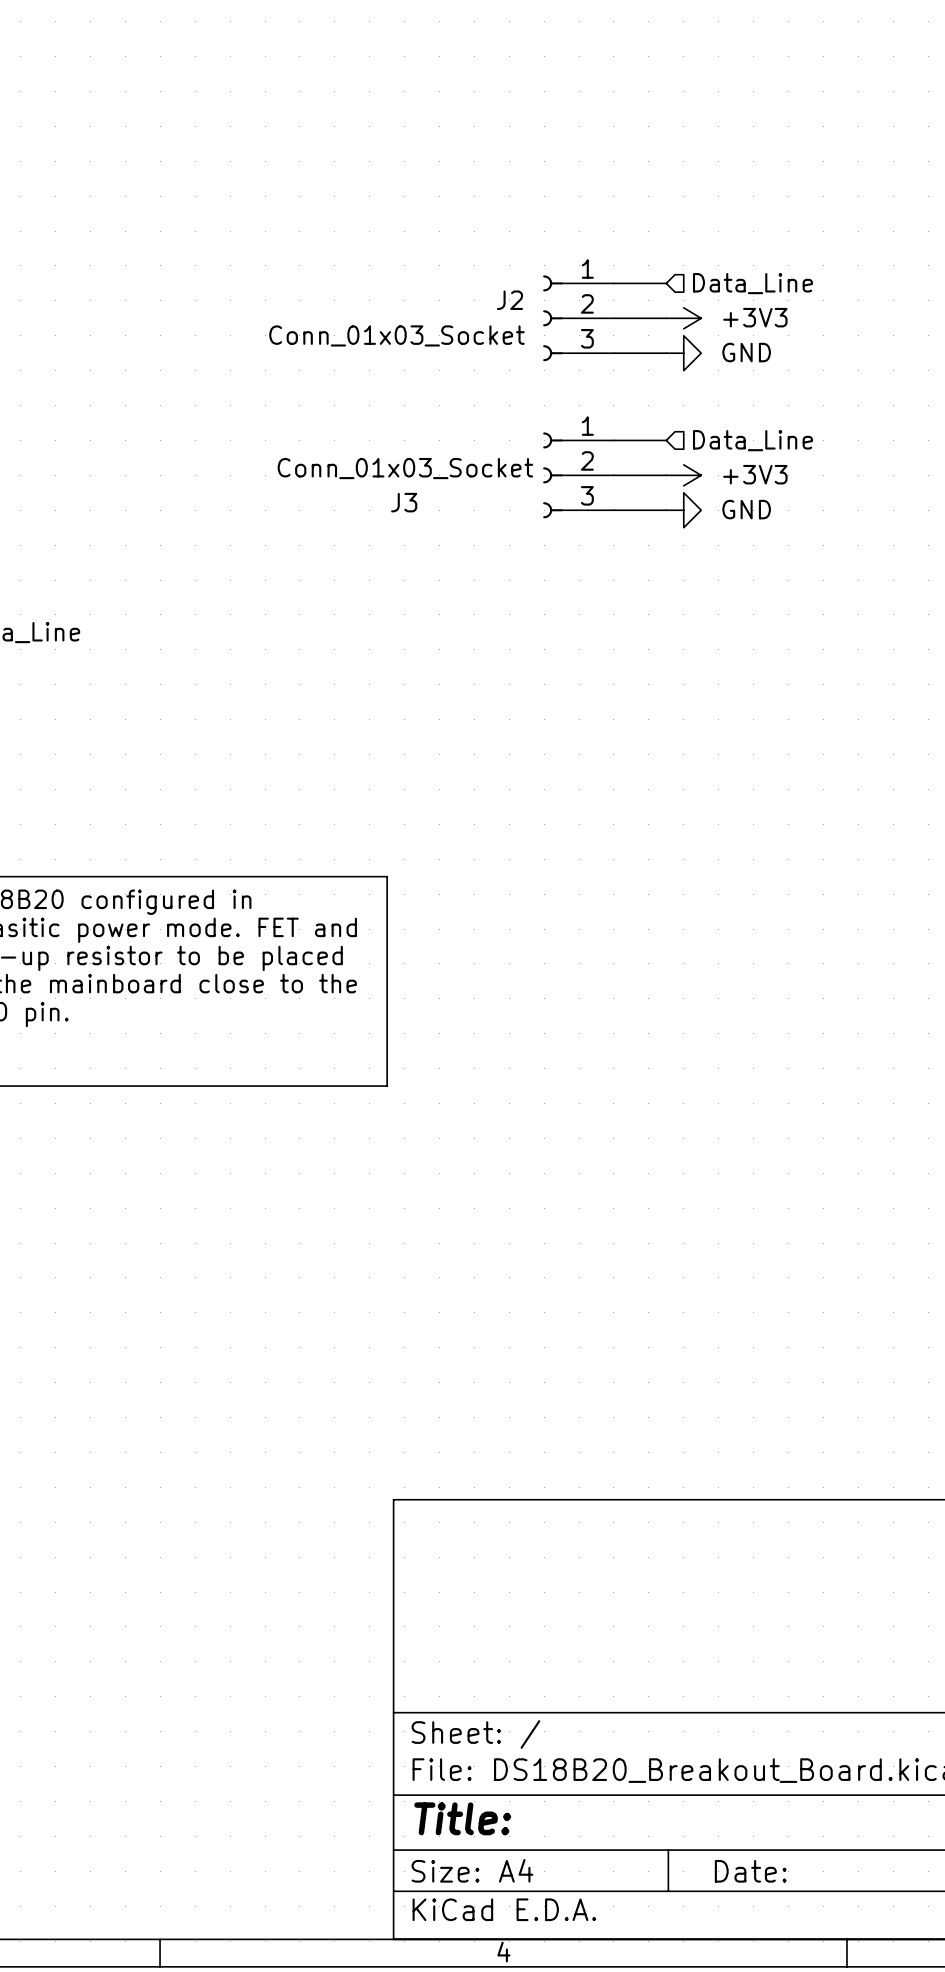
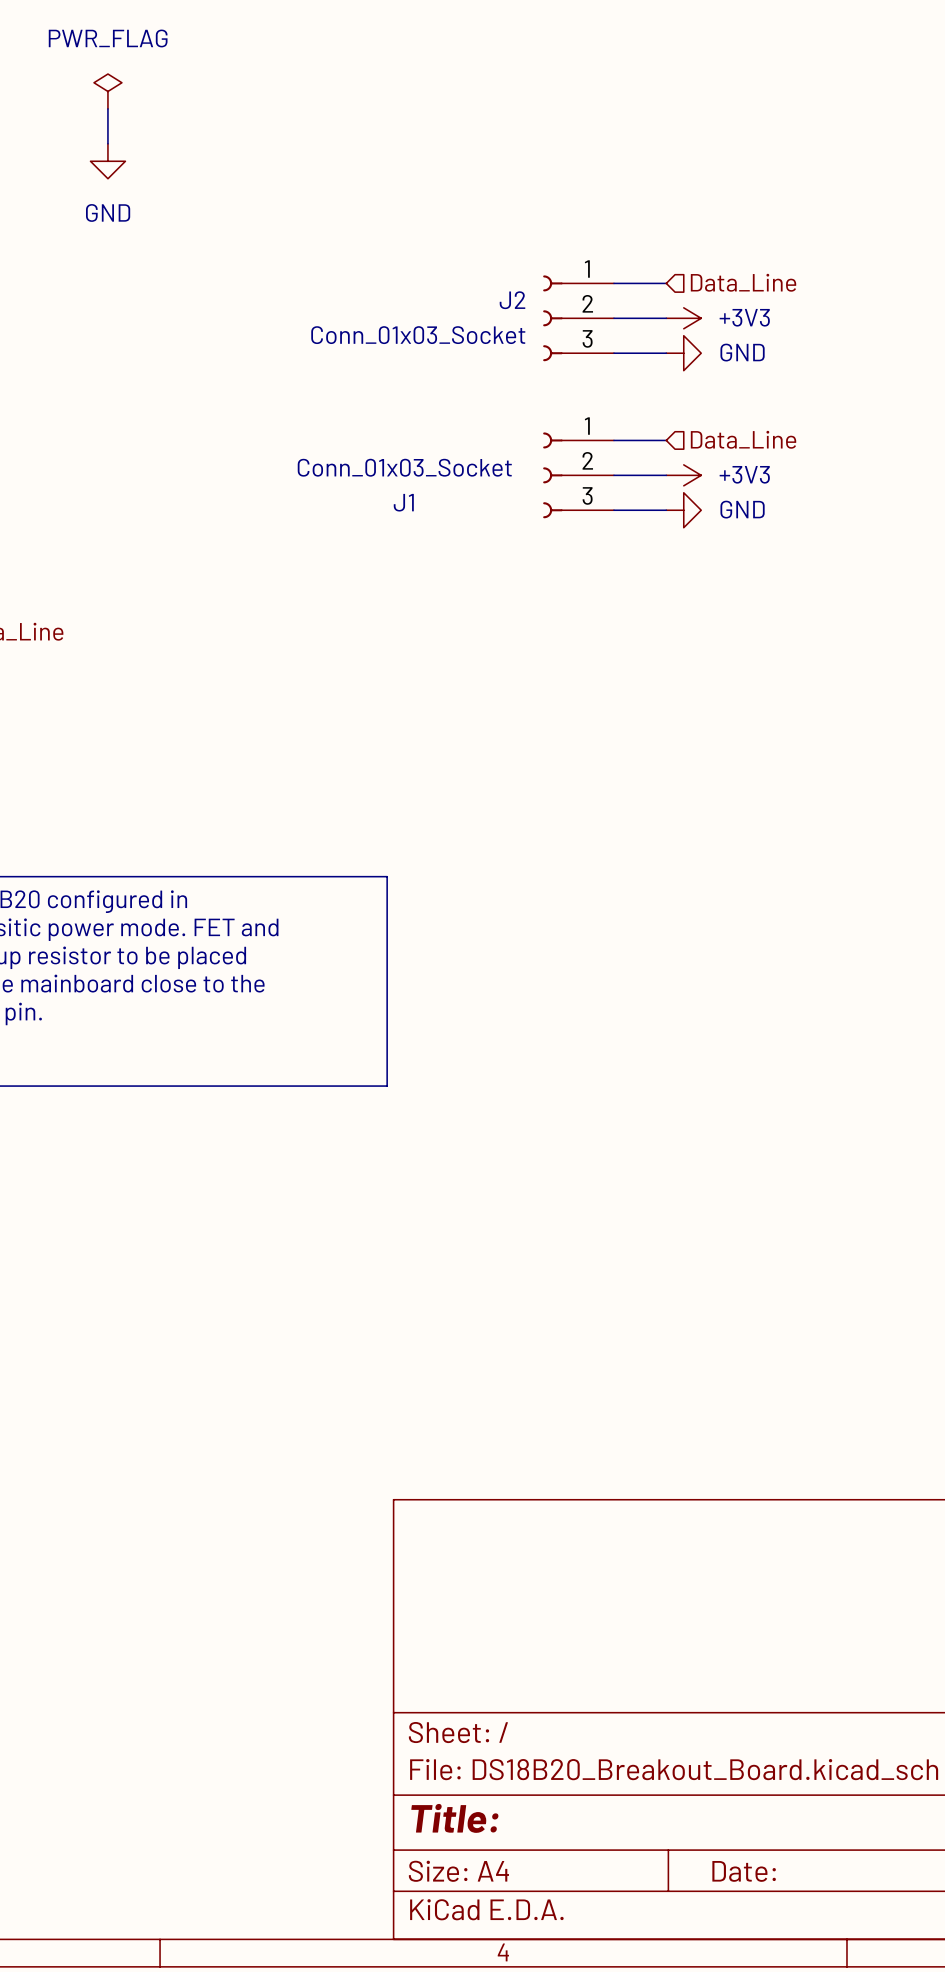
power symbol: none -> PWR_FLAG (107, 91)
wire: none -> (107, 108) (107, 143)
power symbol: none -> GND (107, 161)
J3 name: J3 (404, 502) -> J1 (403, 502)

